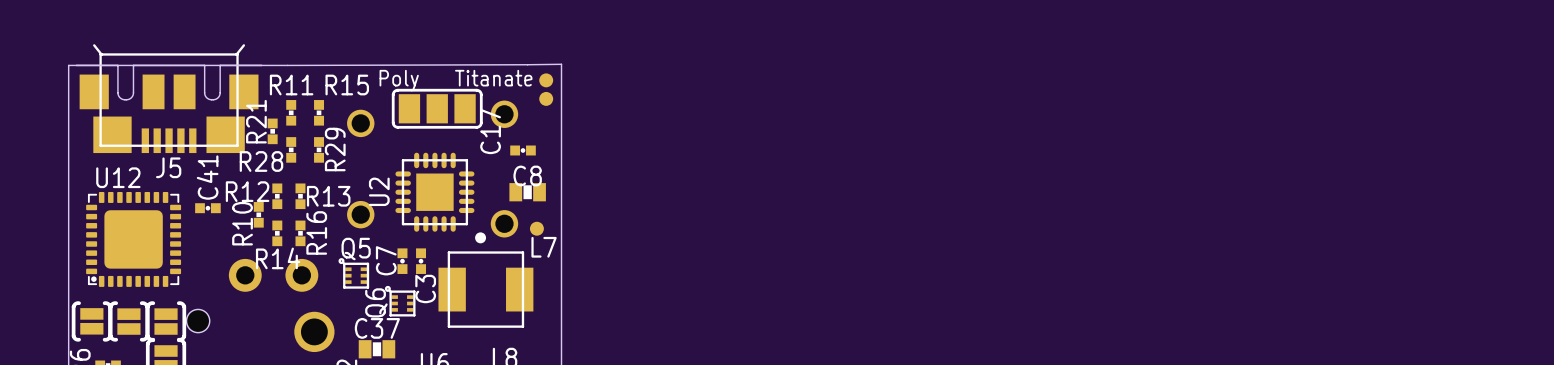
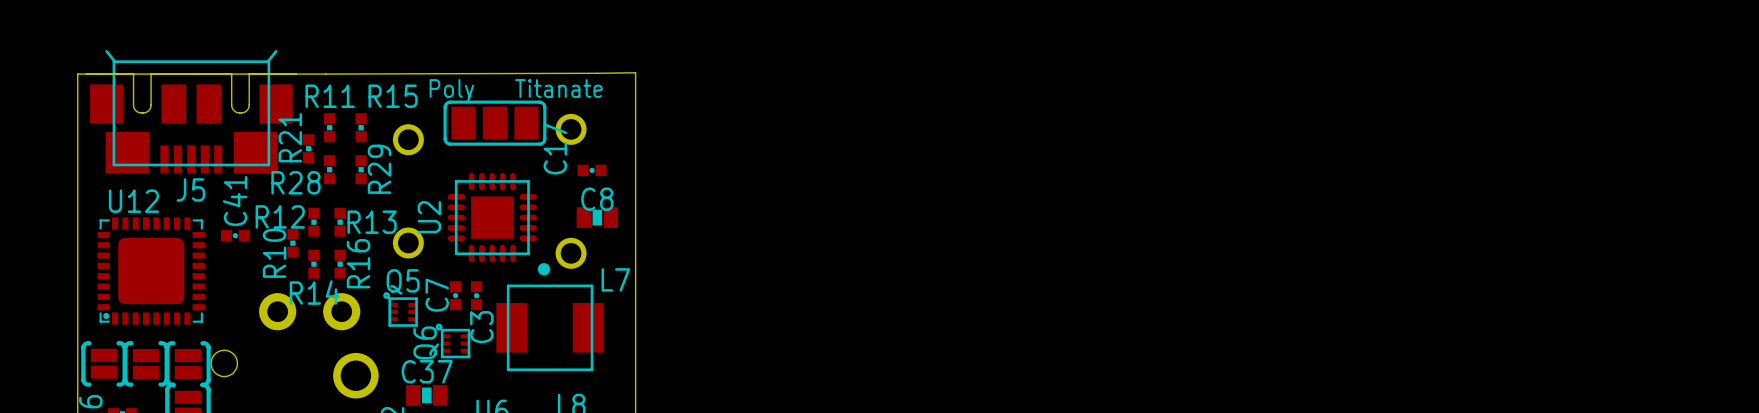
part: (546, 80) -> none
part: (546, 98) -> none
part: (536, 228) -> none

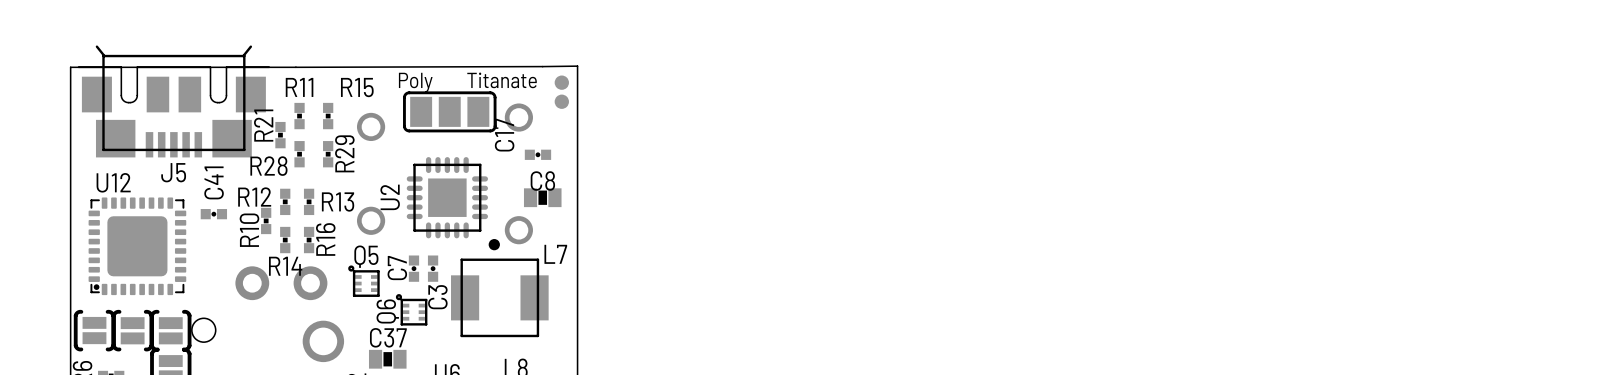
part: none -> (561, 82)
part: none -> (561, 101)

